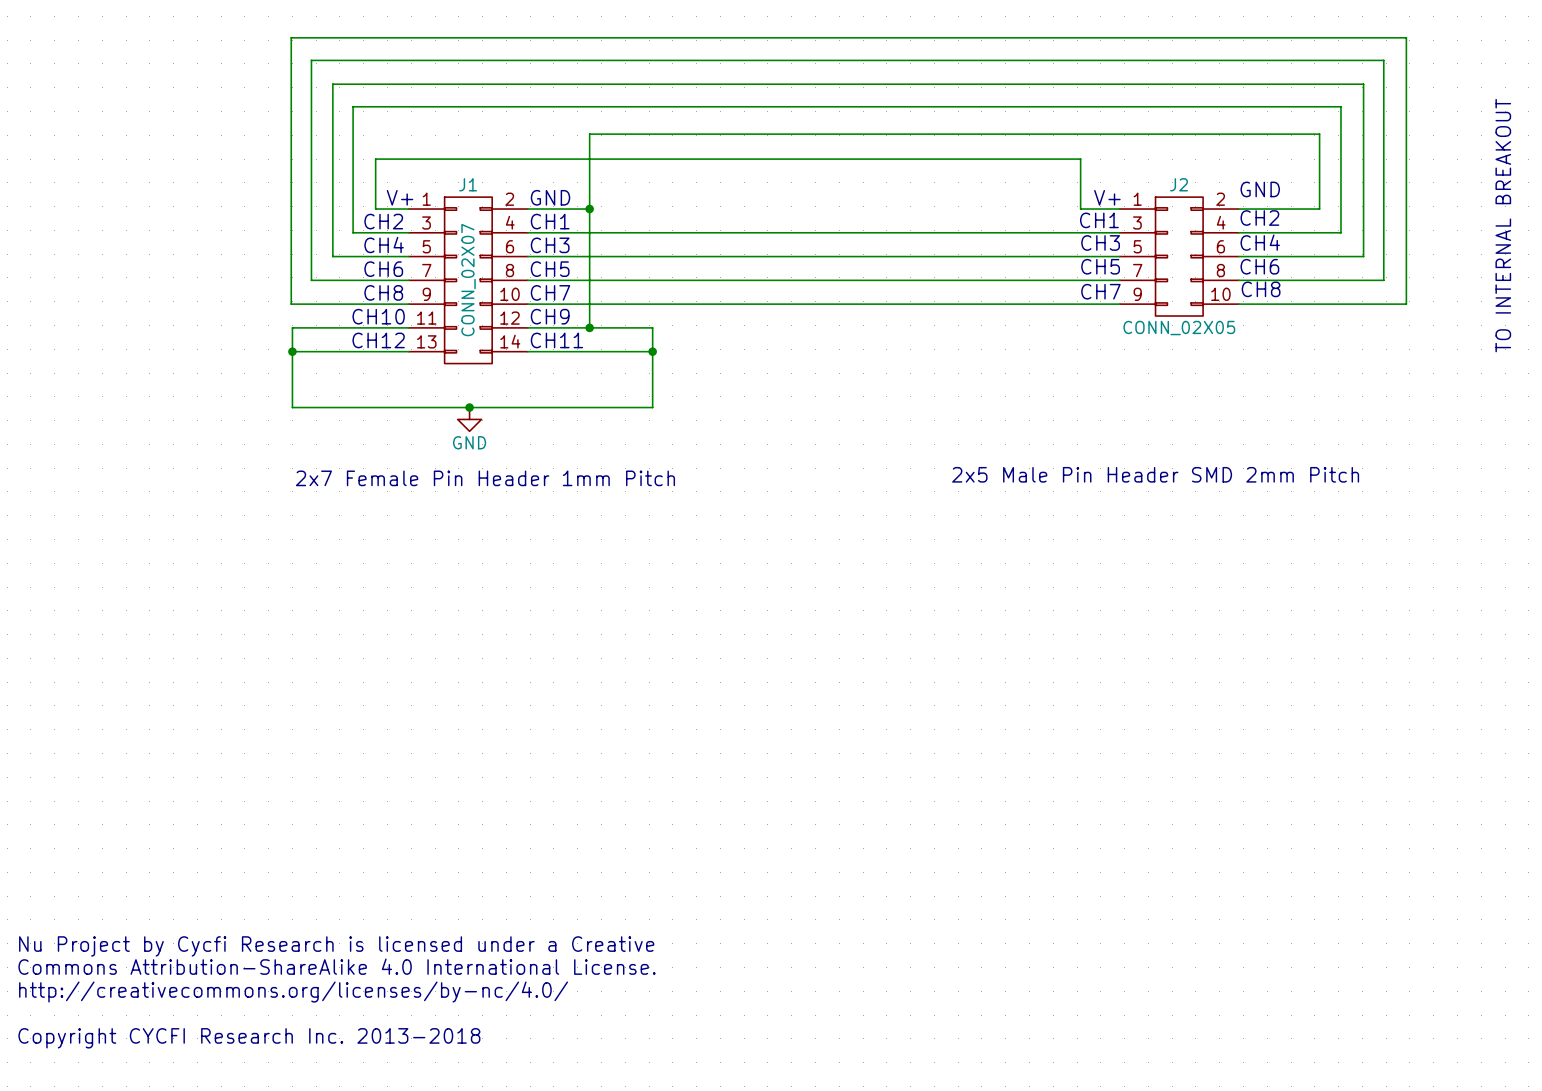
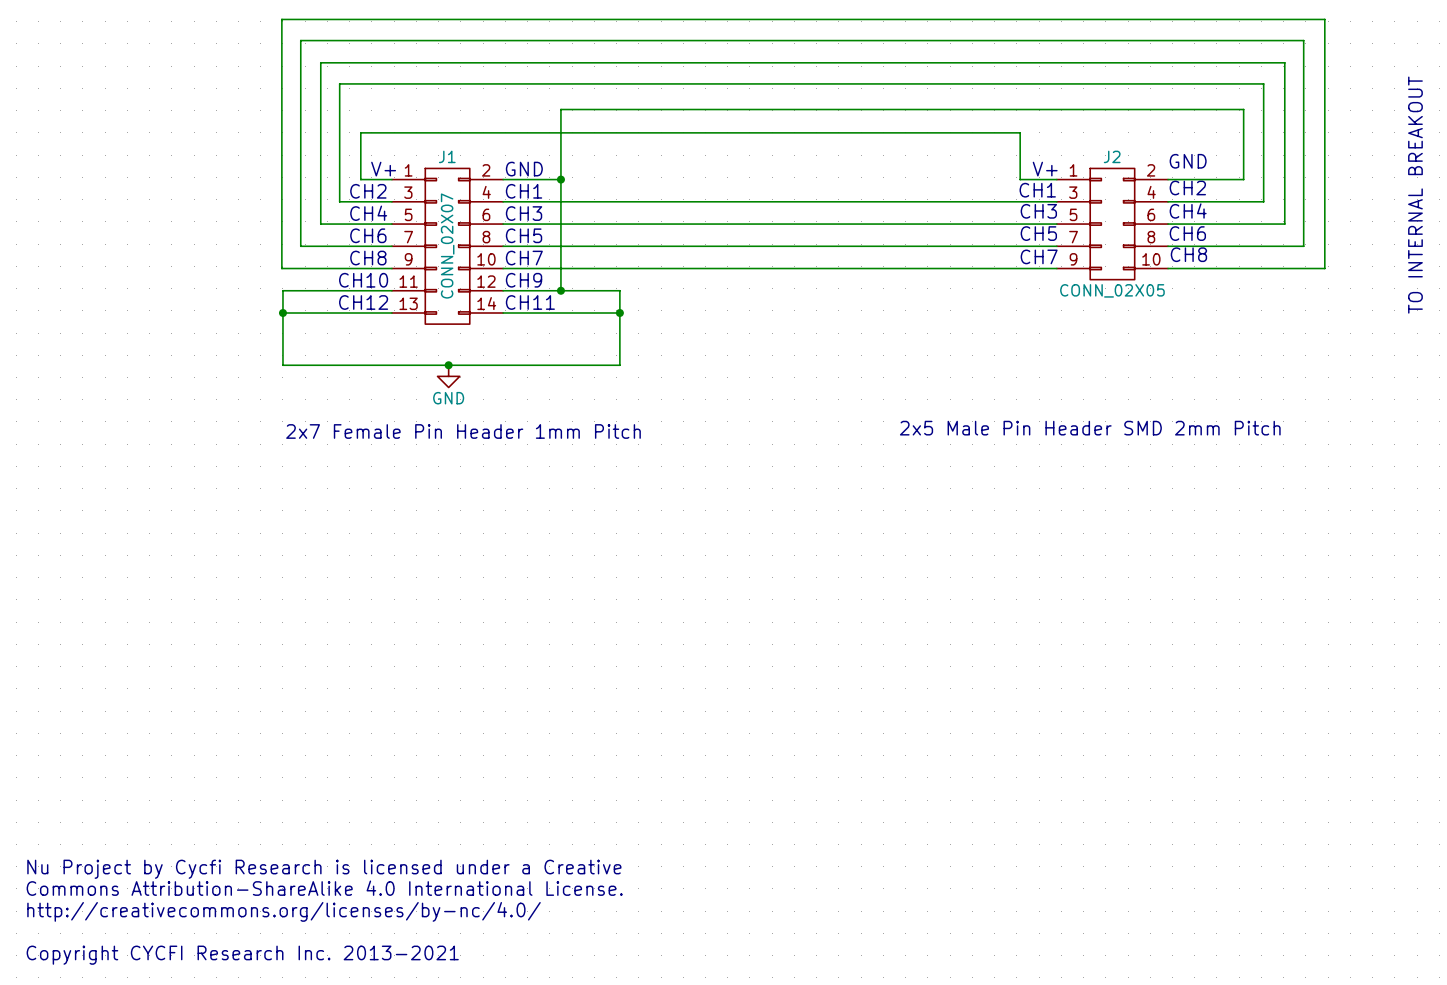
text: Copyright CYCFI Research Inc. 2013-2018 (249, 1038) -> Copyright CYCFI Research Inc. 2013-2021 (242, 955)

